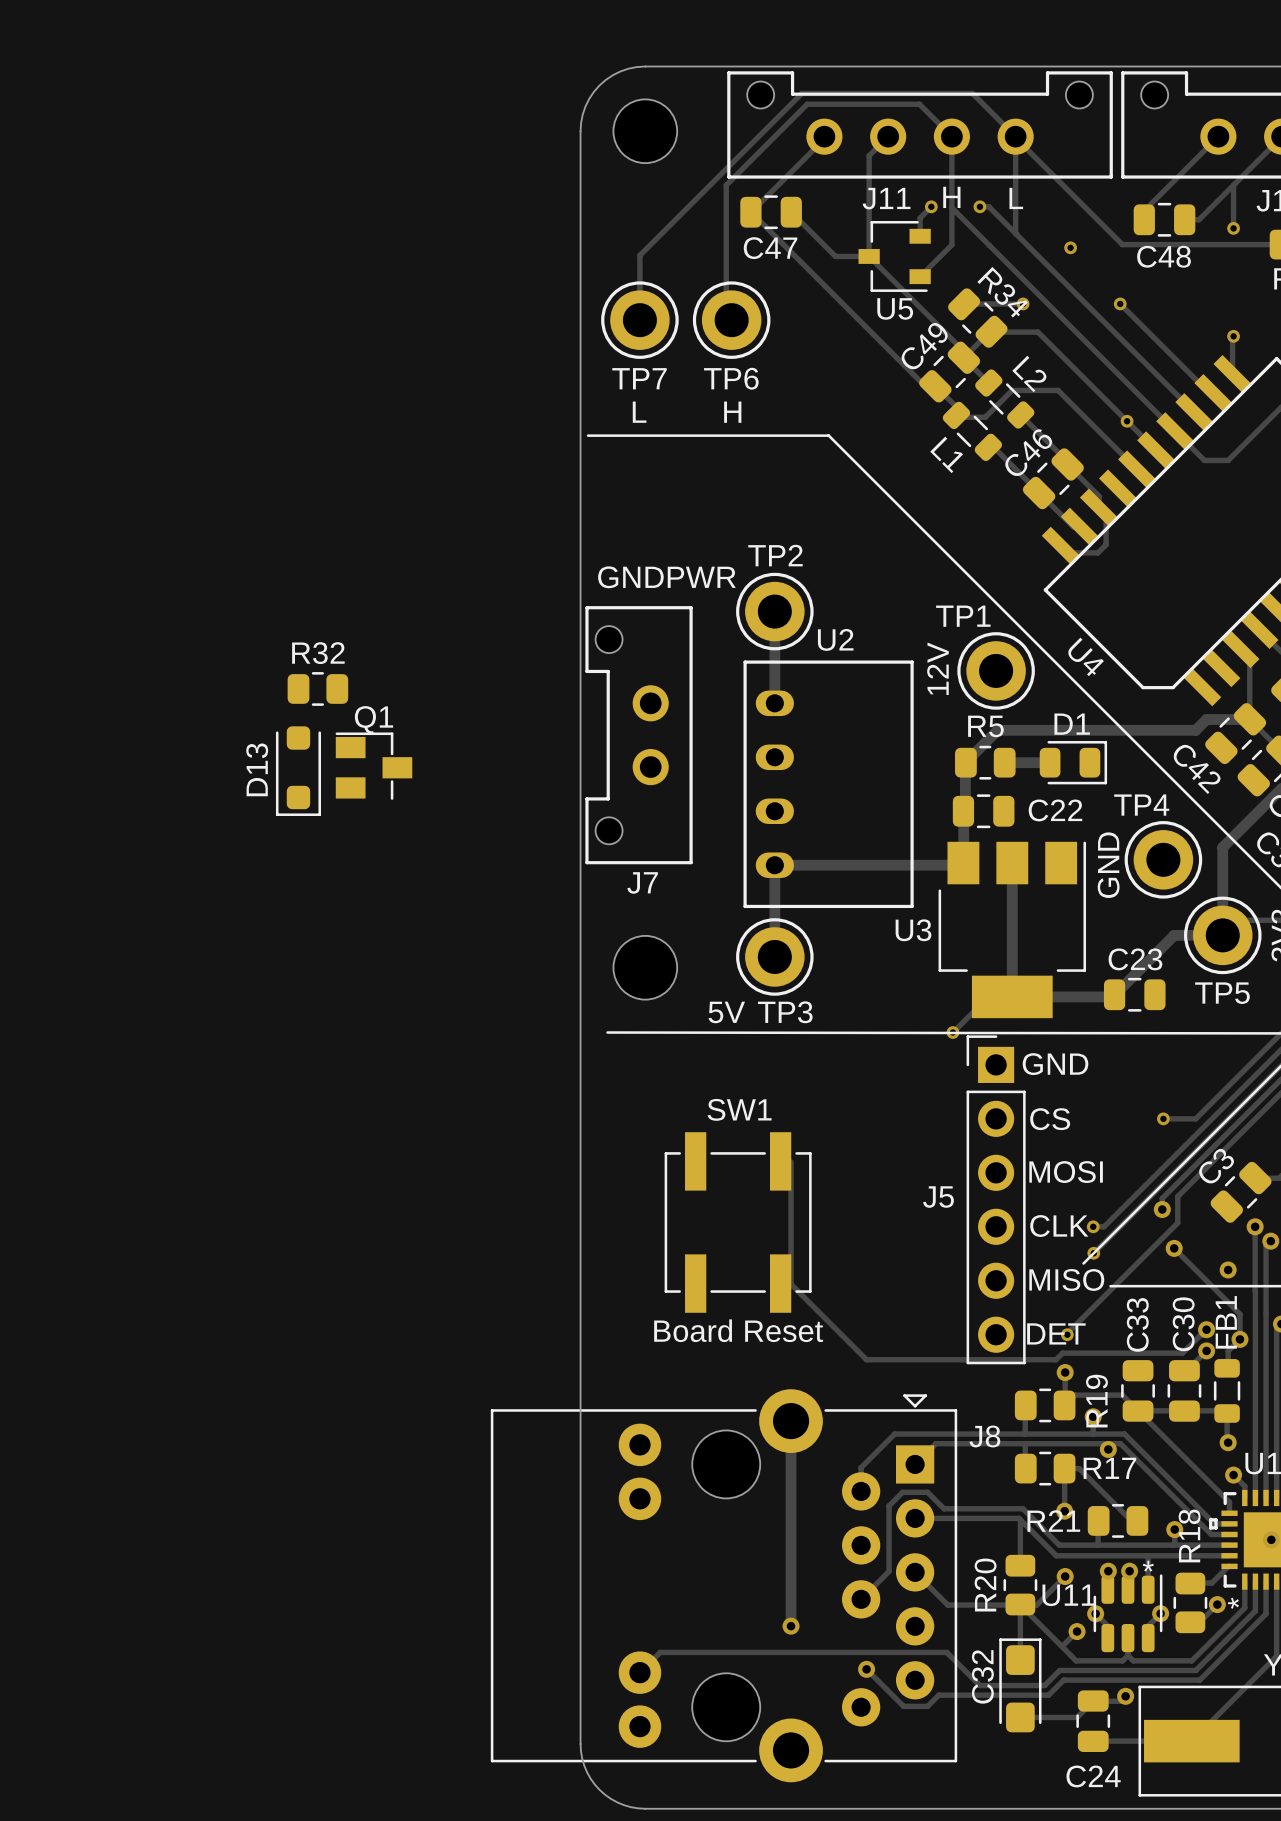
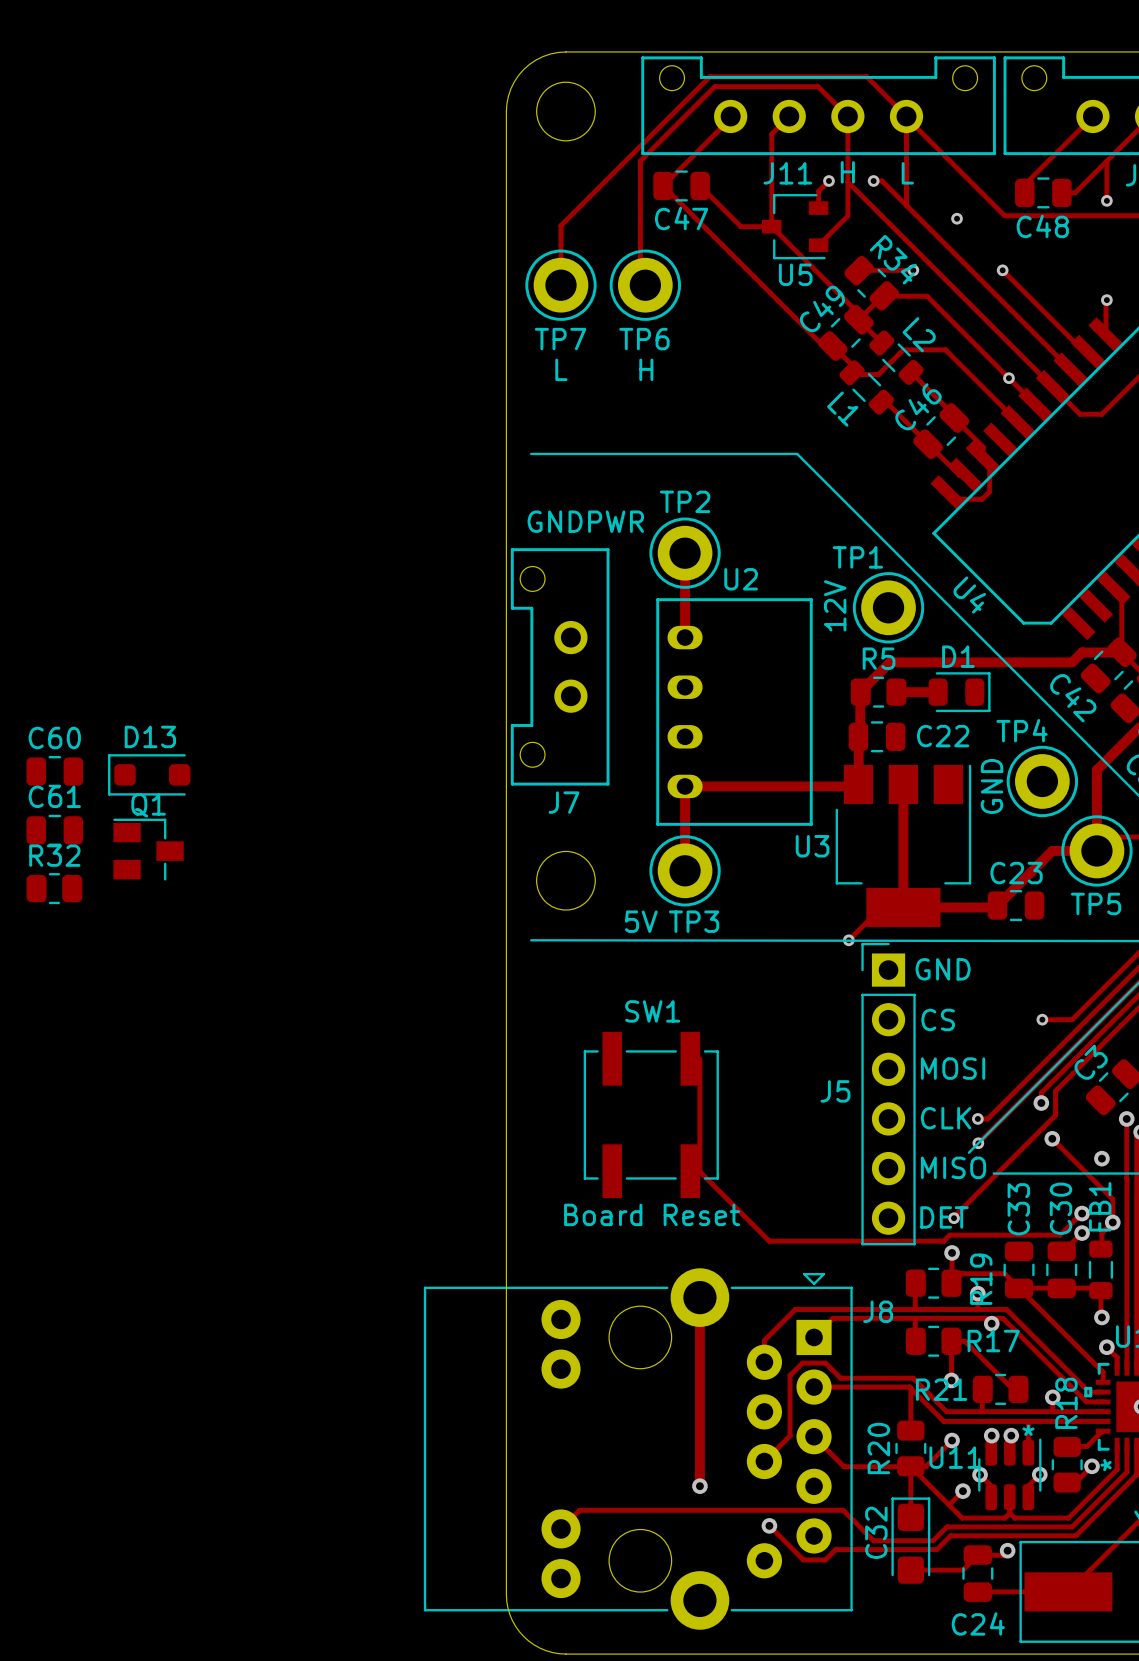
line: (588, 435) (828, 435) -> none
line: (828, 435) (896, 503) -> (531, 453) (797, 453)
R32 position: (317, 688) -> (54, 888)
Q1 position: (373, 766) -> (148, 849)
D13 rotation: 0° (298, 771) -> 90° clockwise (149, 774)
D13 position: (298, 771) -> (149, 774)
C60: none -> (54, 771)
C61: none -> (54, 830)

